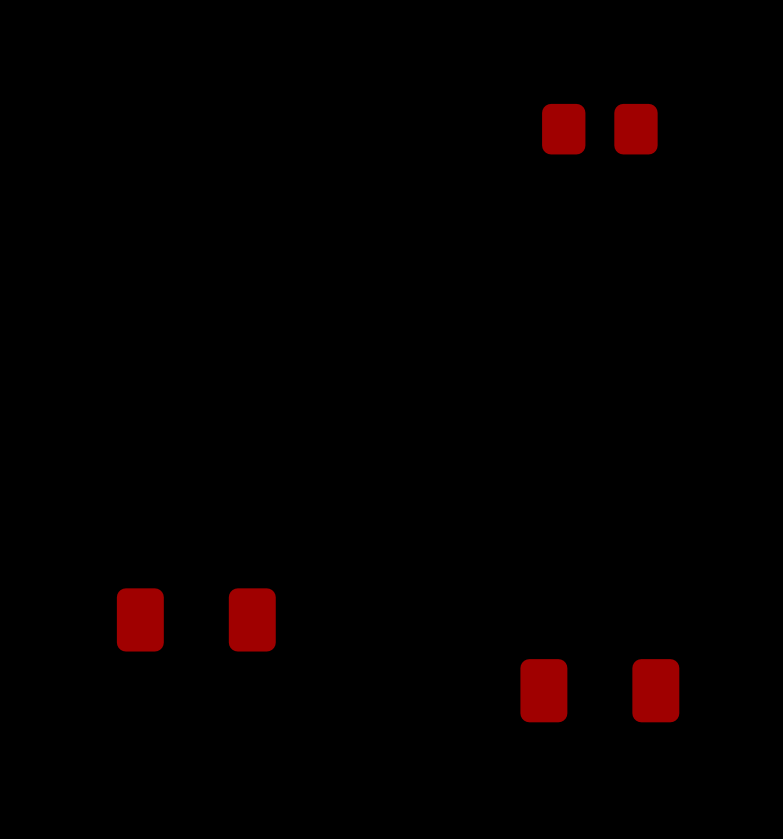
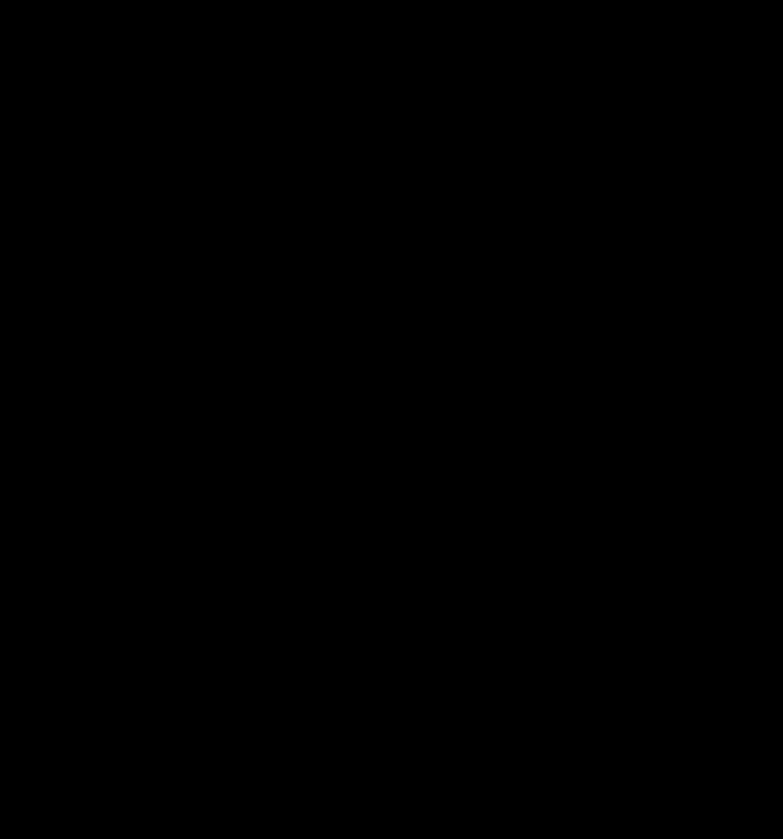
part: (599, 129) -> none
part: (196, 619) -> none
part: (599, 690) -> none

